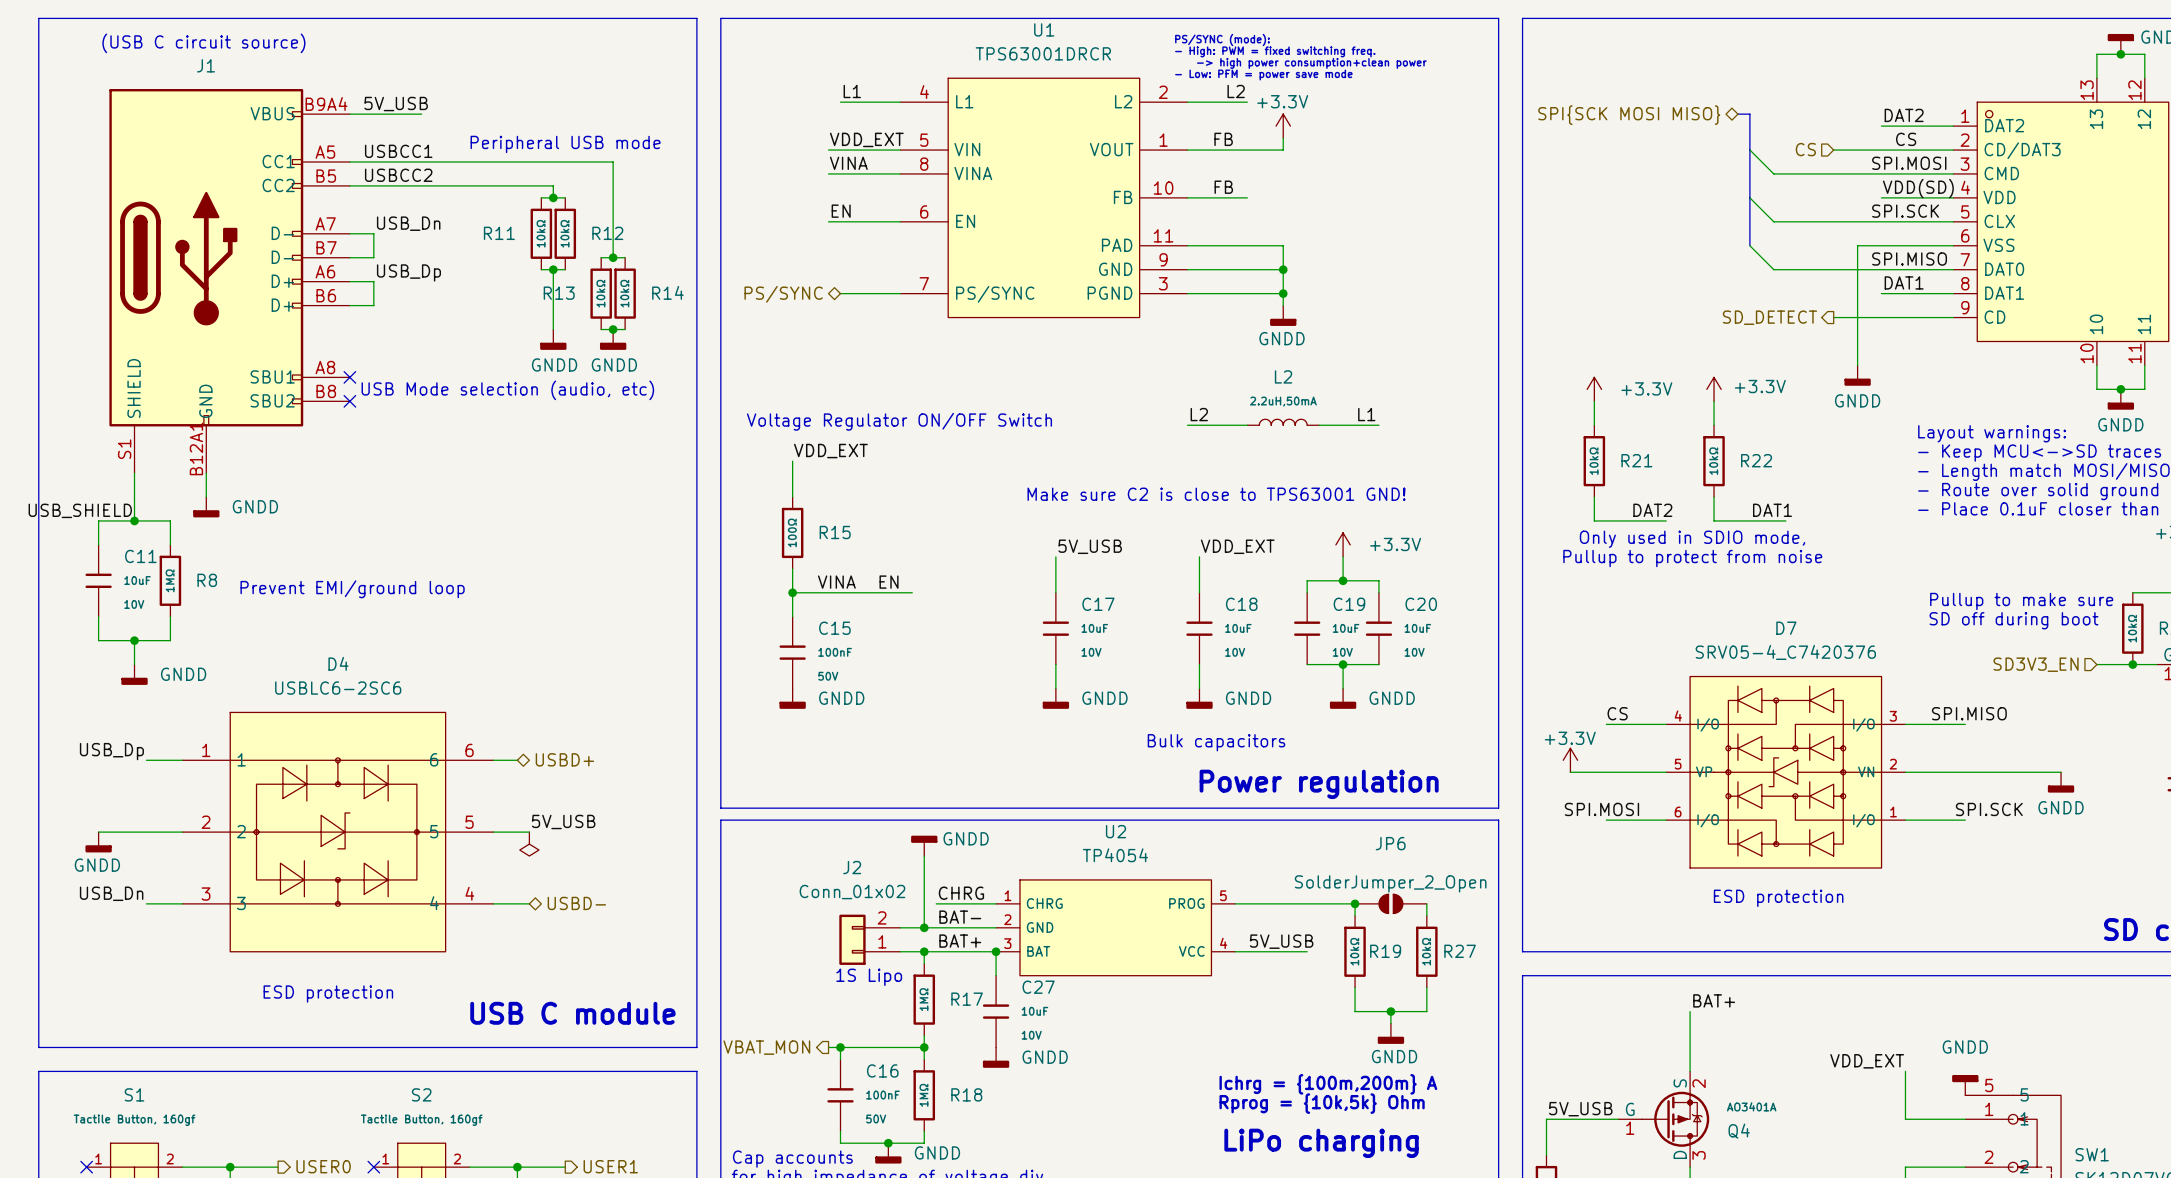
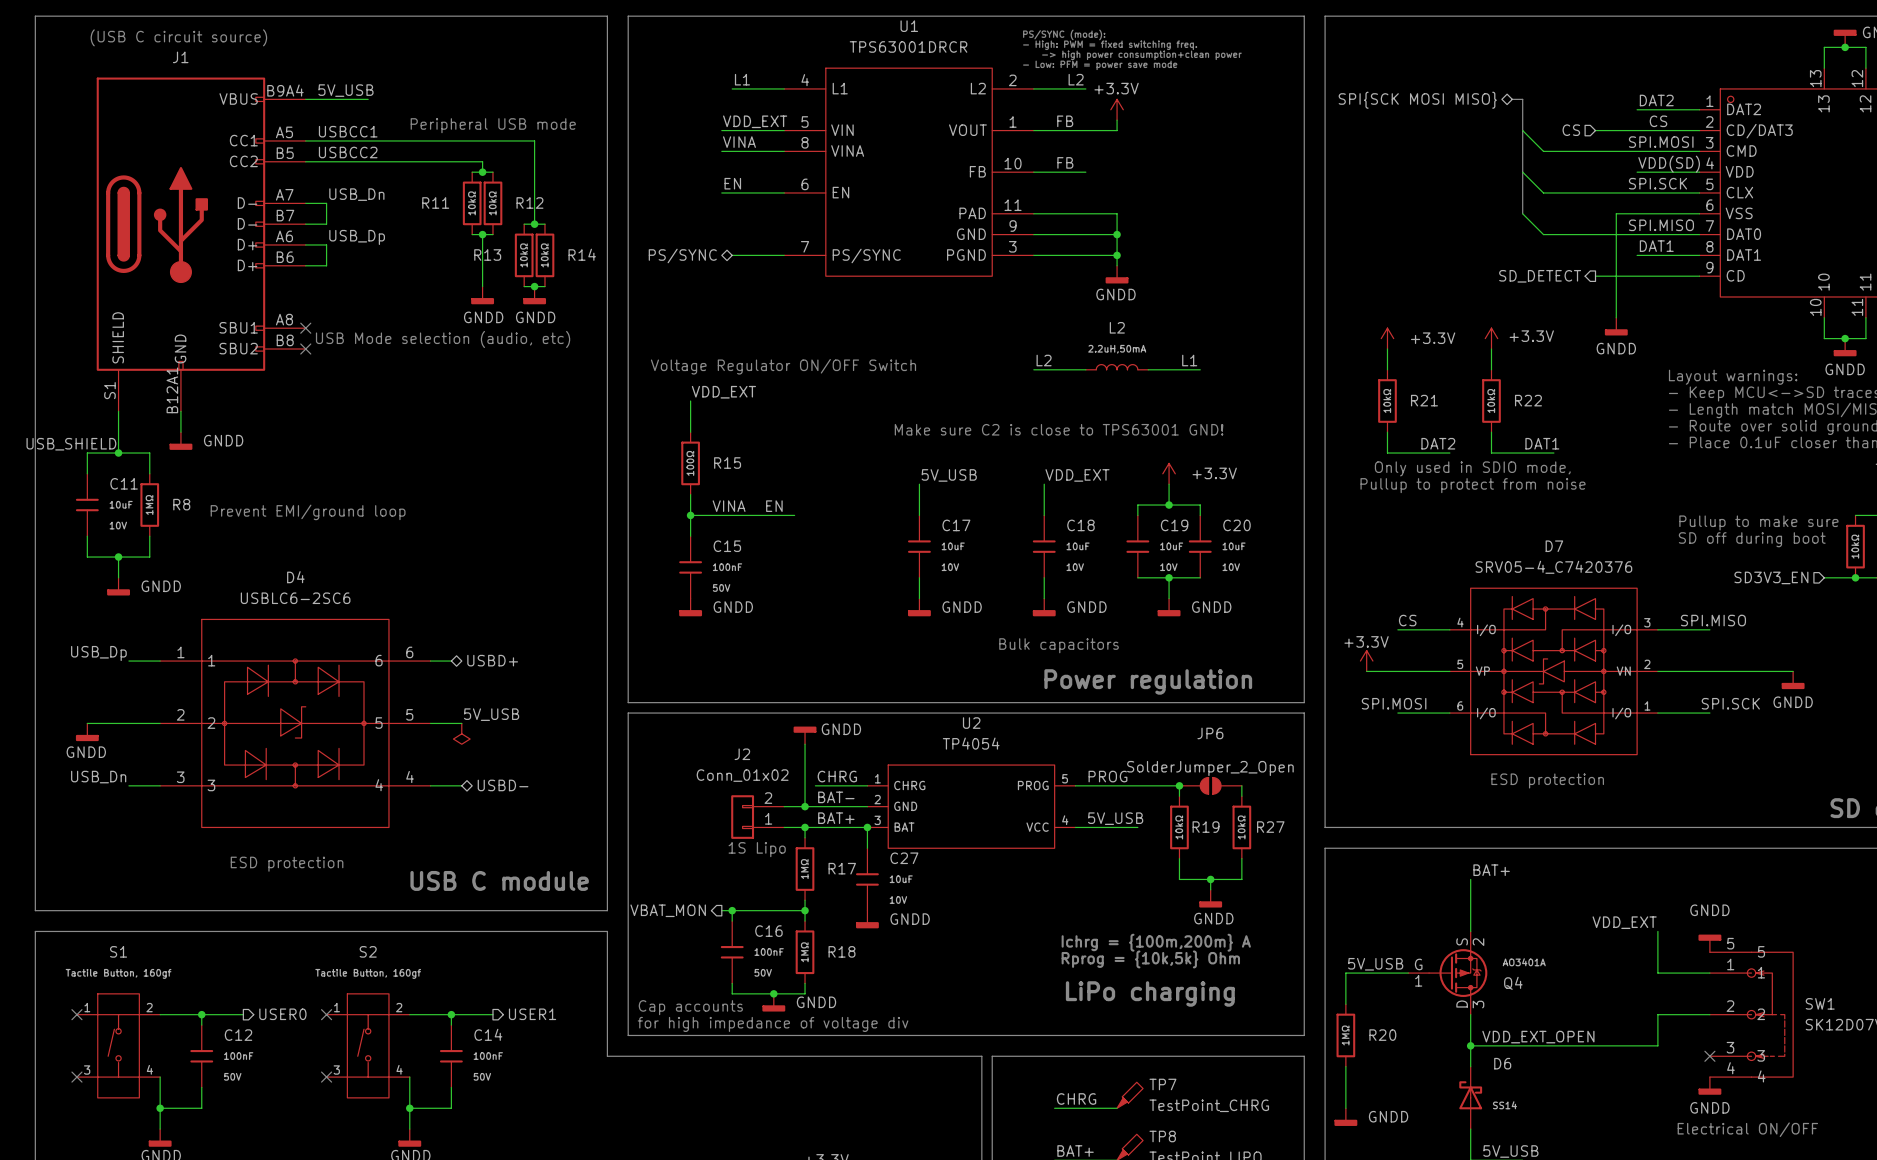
label: none -> PROG (1107, 776)

